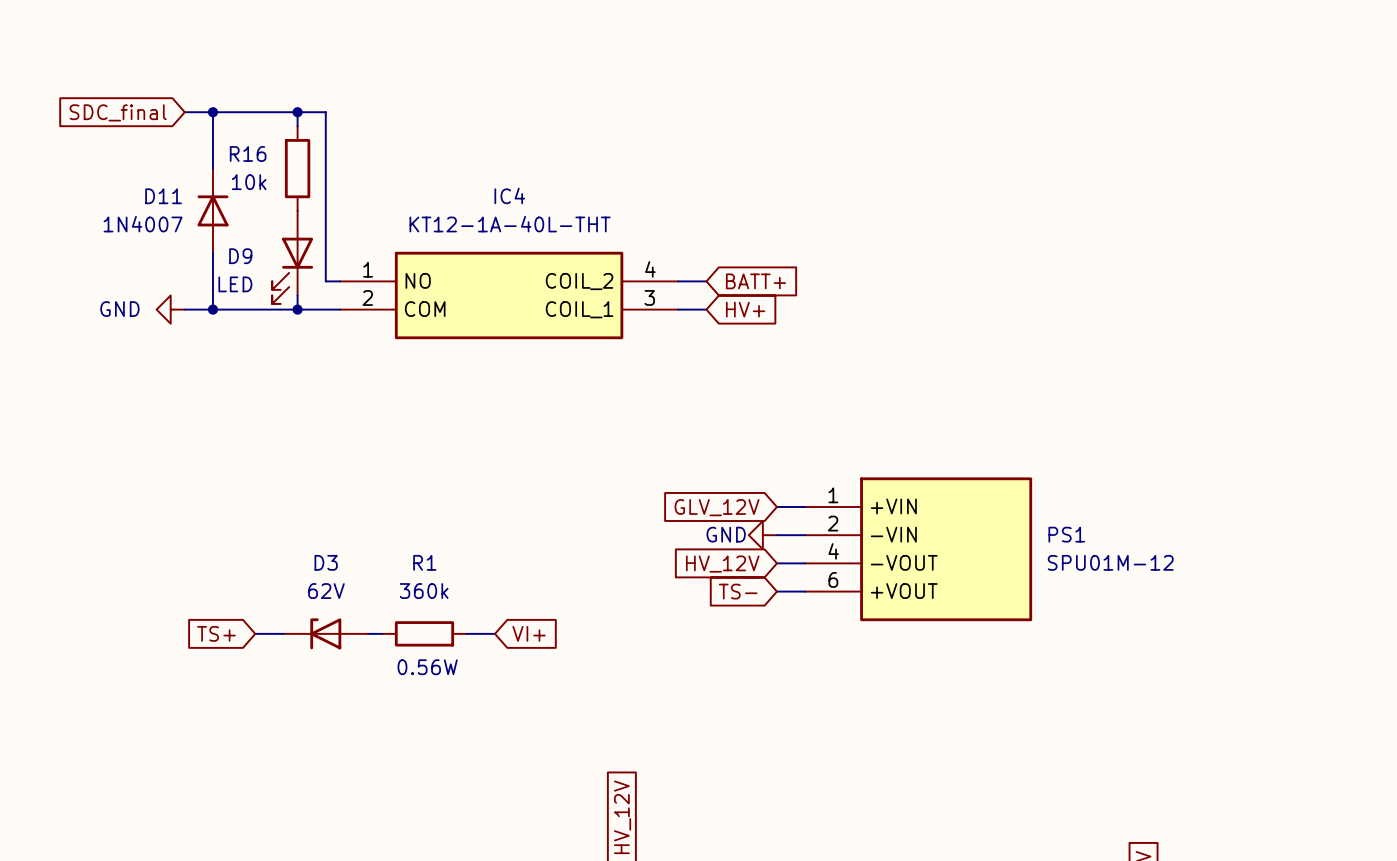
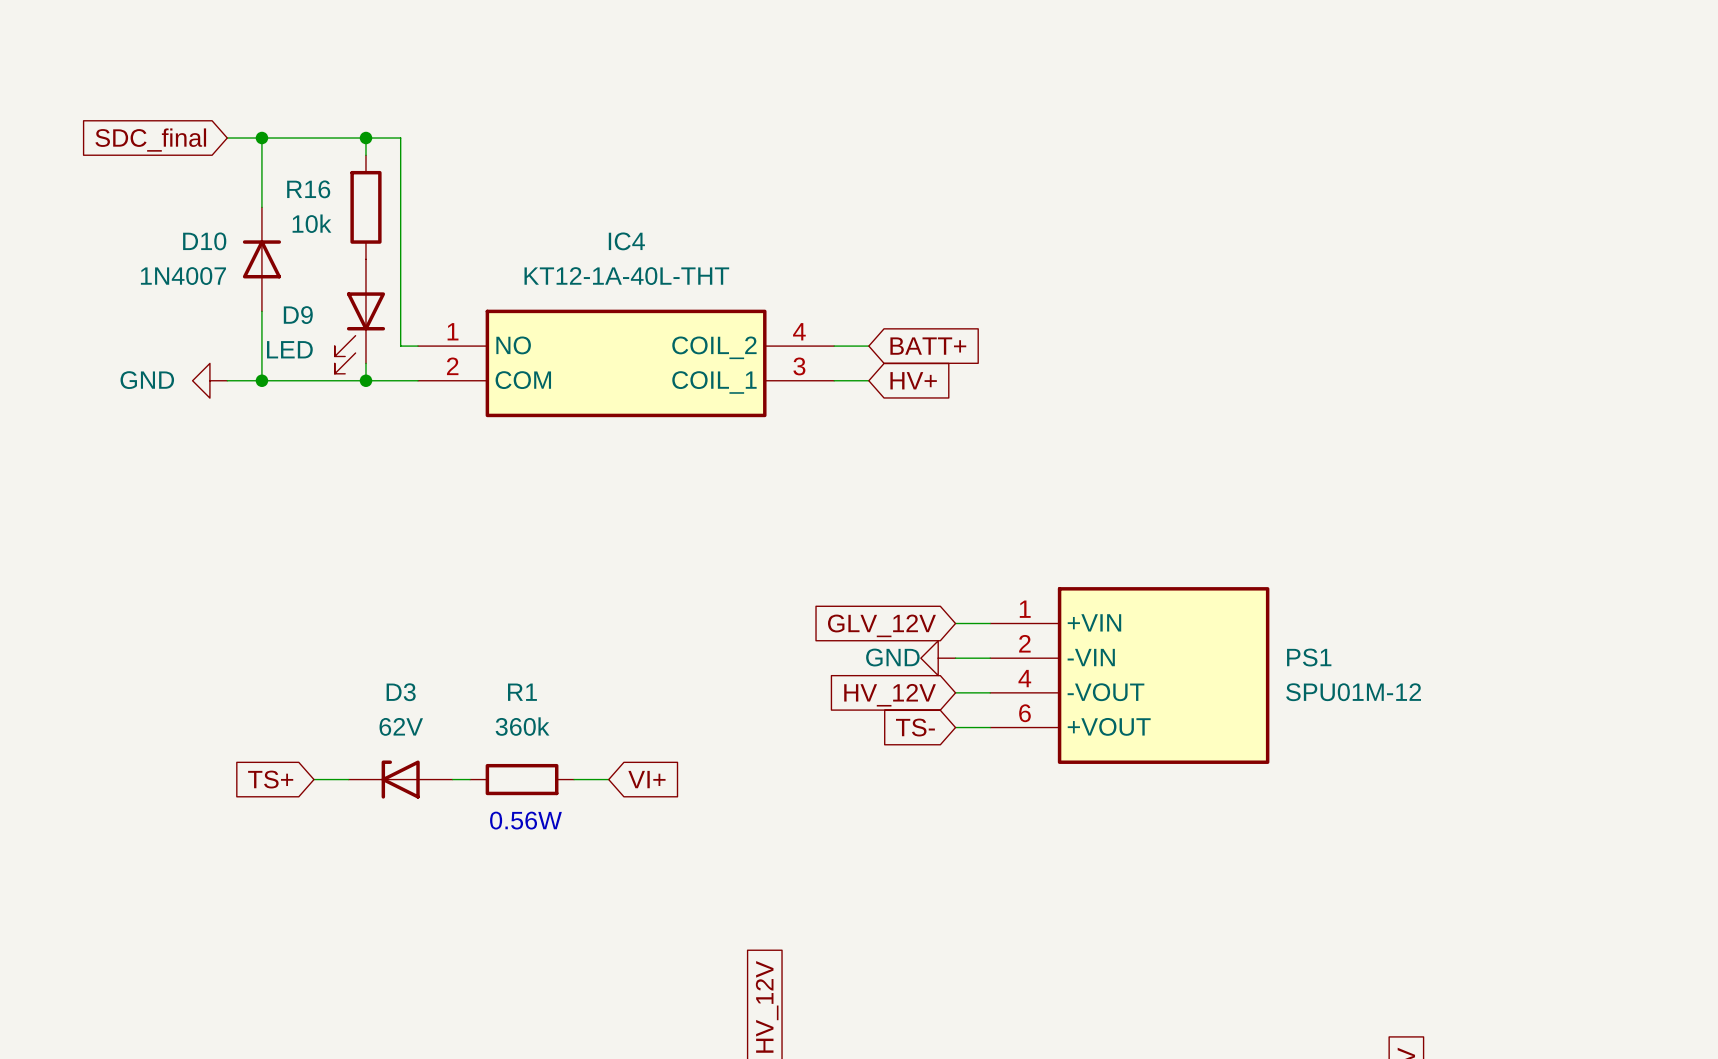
D11 name: D11 (163, 196) -> D10 (204, 241)

